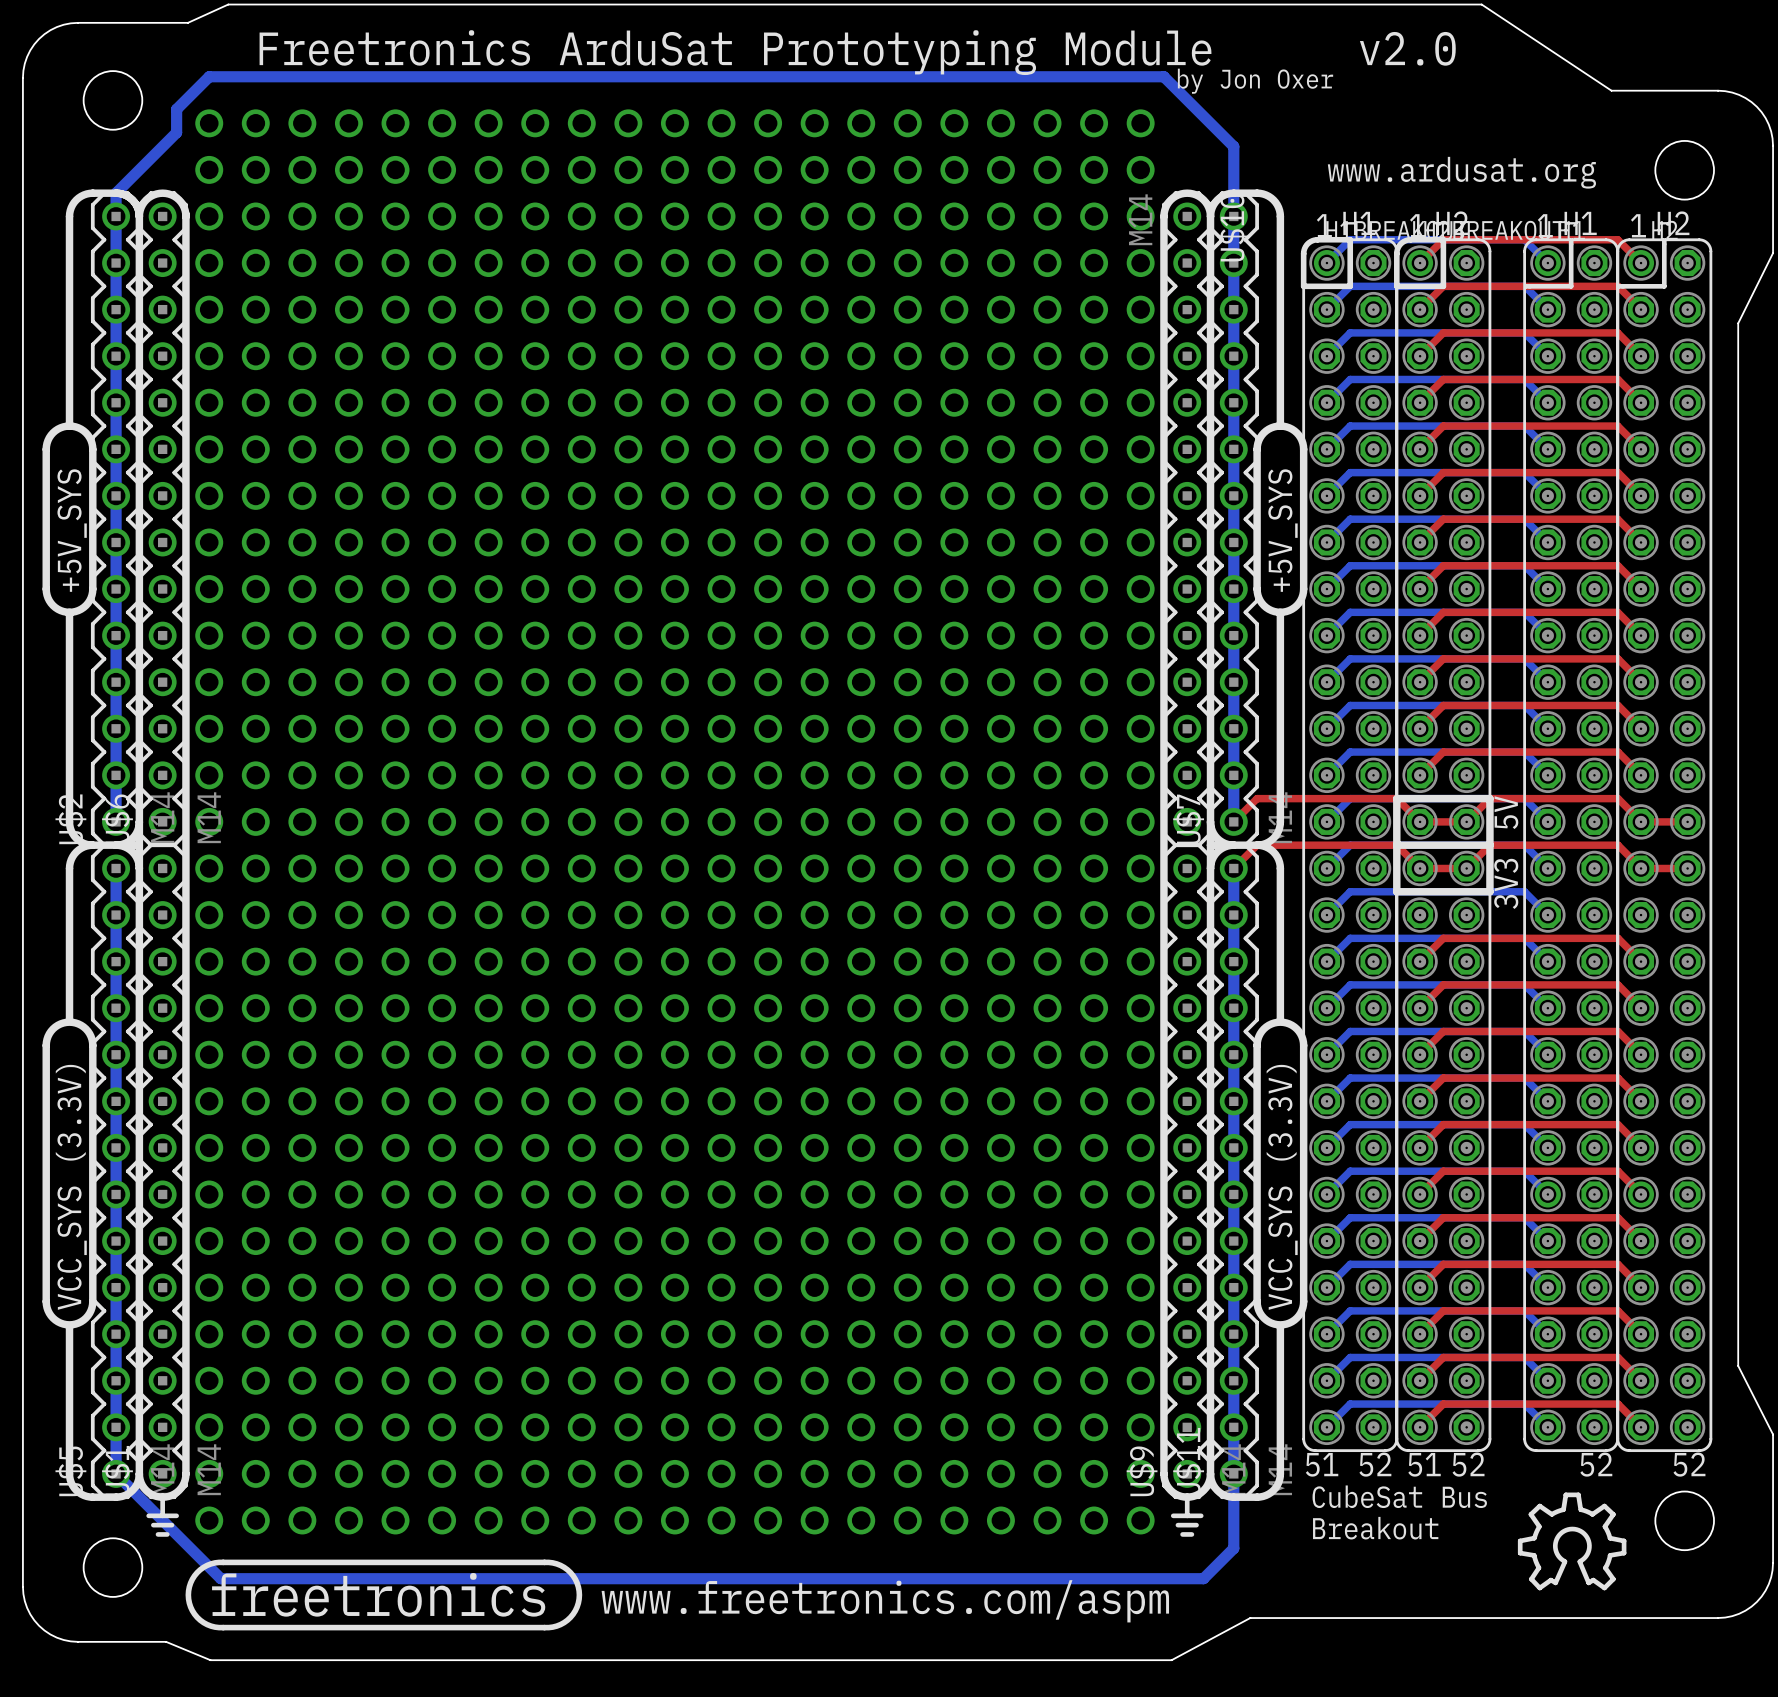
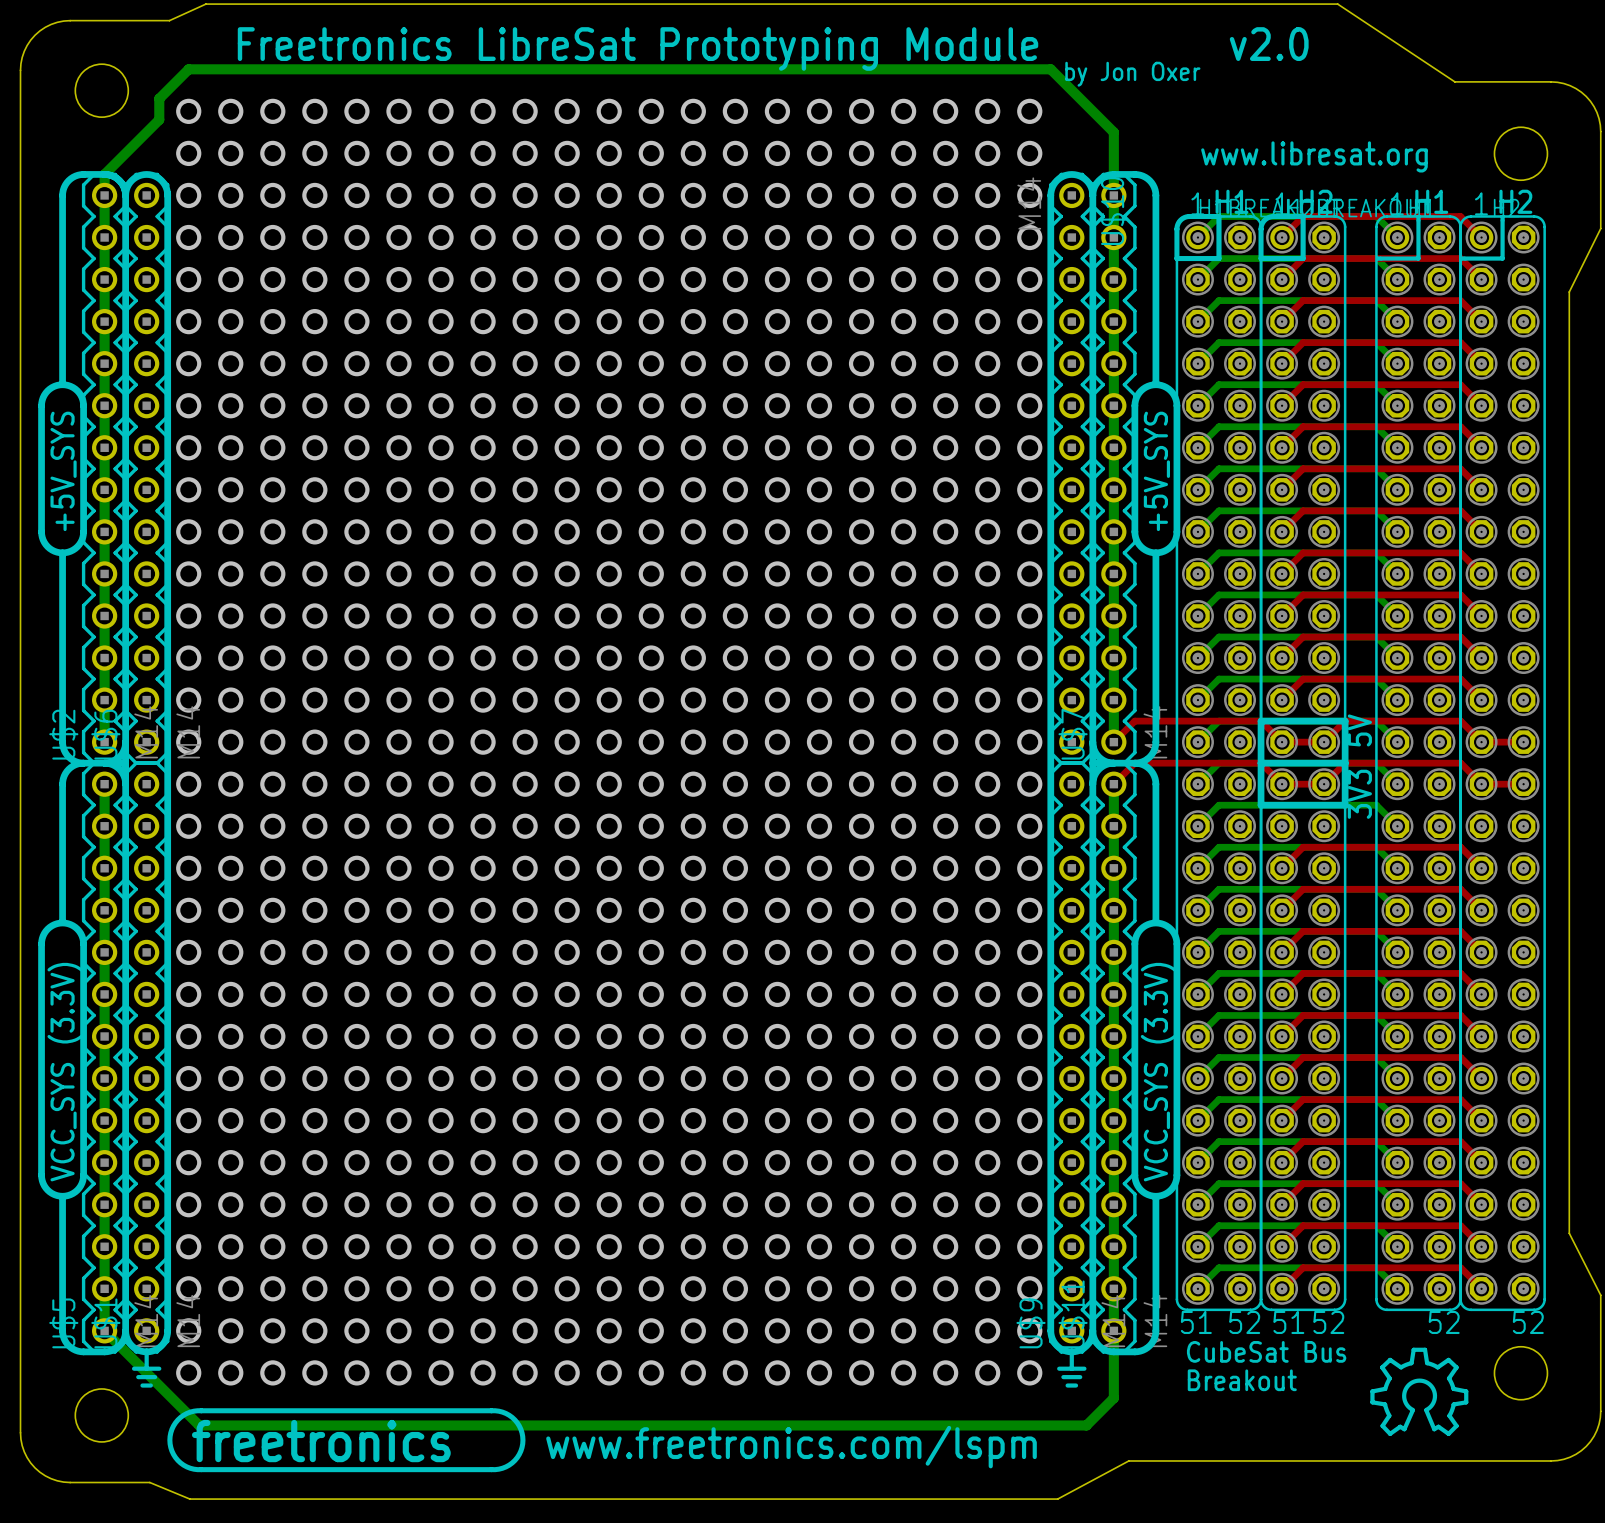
text: Freetronics ArduSat Prototyping Module (735, 52) -> Freetronics LibreSat Prototyping Module (638, 48)
text: www.ardusat.org (1461, 172) -> www.libresat.org (1314, 156)
text: www.freetronics.com/aspm (885, 1601) -> www.freetronics.com/lspm (791, 1447)

